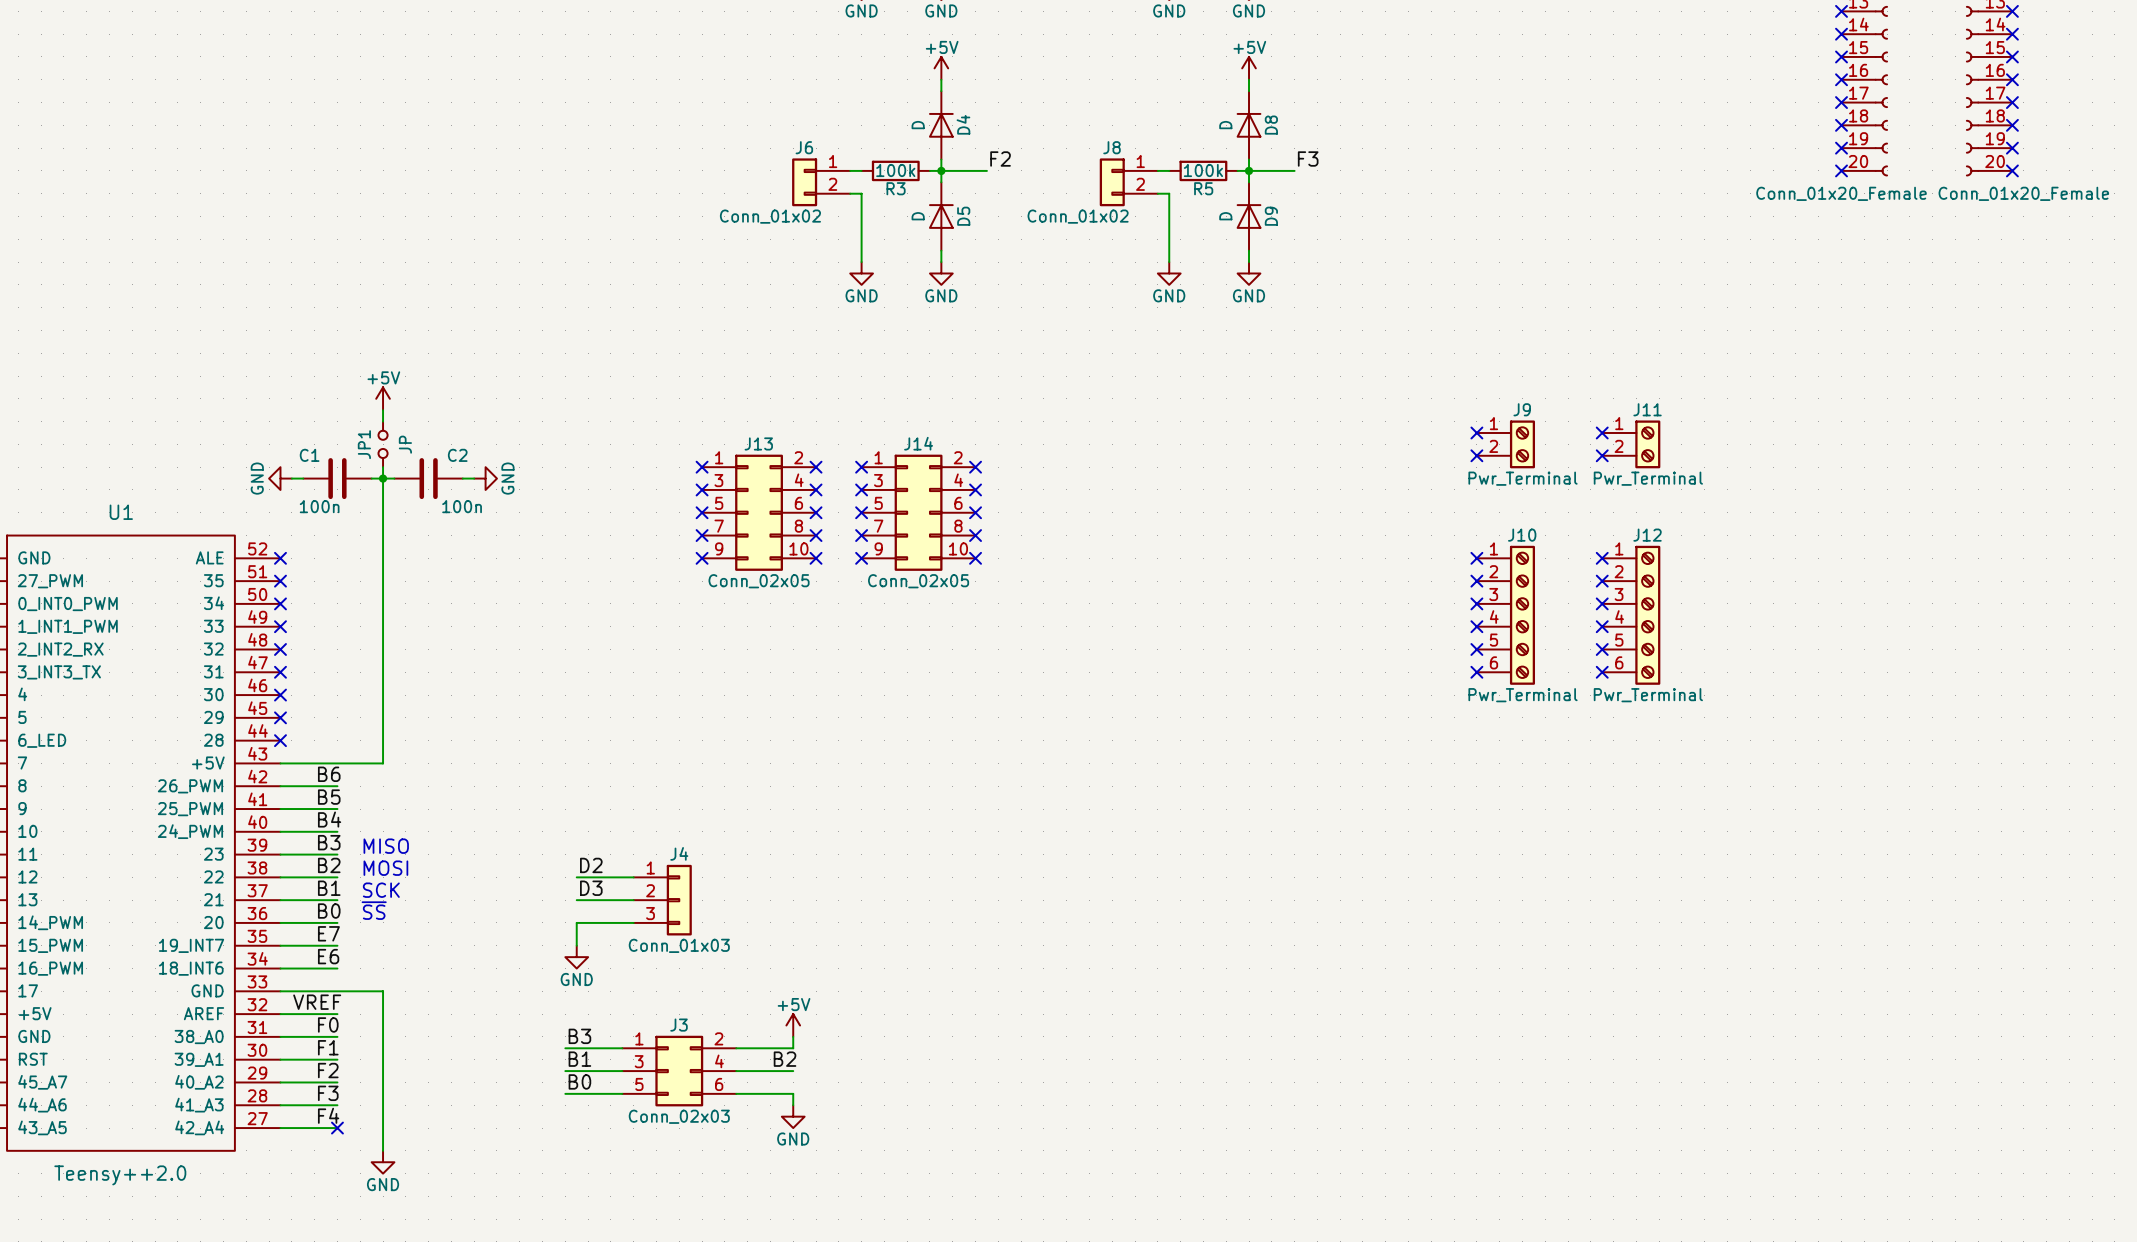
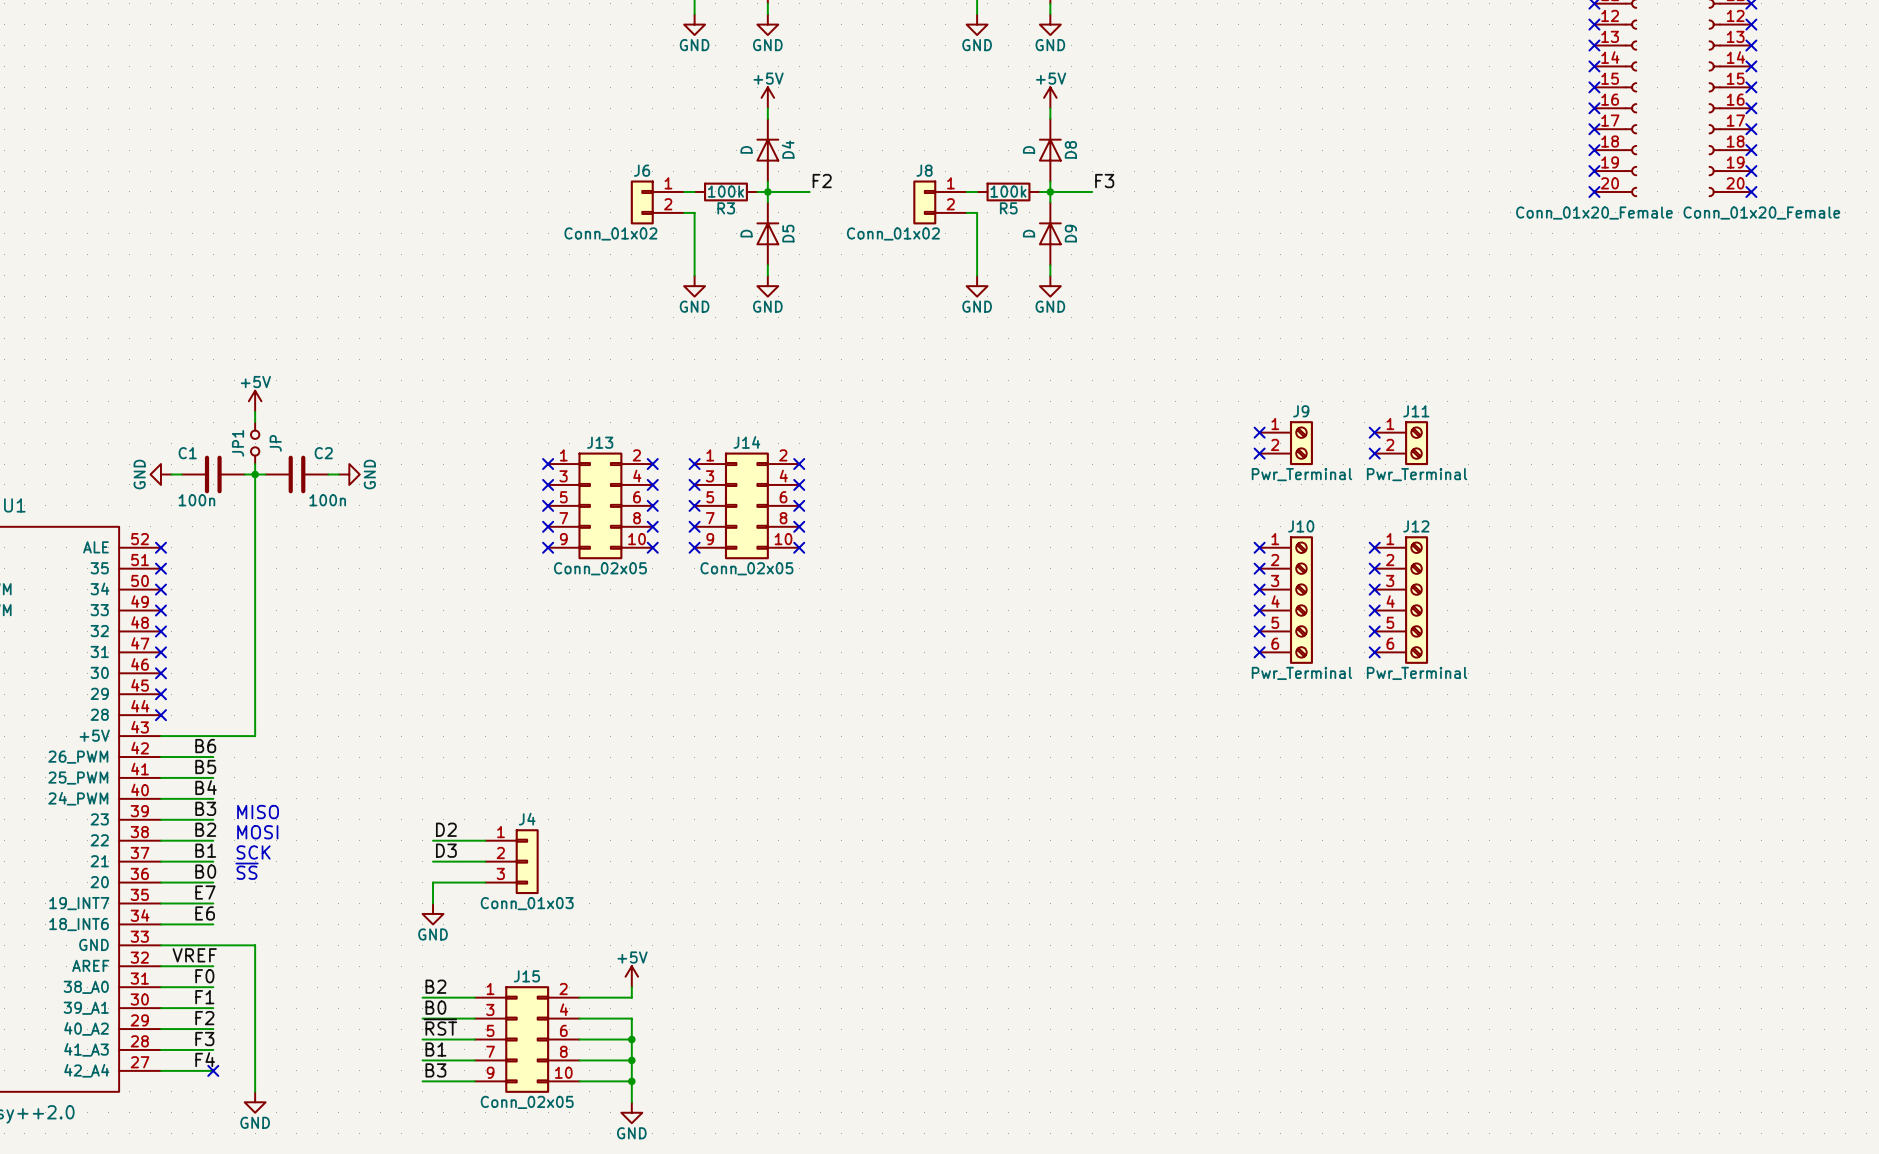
label: B3 (579, 1036) -> B2 (435, 986)
label: B1 (579, 1059) -> B0 (435, 1007)
label: B2 (785, 1059) -> none
J3: Conn_02x03 (679, 1071) -> none
wire: none -> (631, 1018) (631, 1039)
label: B0 (579, 1081) -> ~{RST} (440, 1027)
J15: none -> Conn_02x05 (527, 1039)
junction: none -> (631, 1039)
label: none -> B1 (435, 1049)
wire: none -> (631, 1049) (631, 1102)
wire: none -> (422, 1060) (474, 1060)
wire: none -> (579, 1060) (631, 1060)
power symbol position: GND (793, 1116) -> GND (631, 1112)
junction: none -> (631, 1060)
label: none -> B3 (435, 1070)
wire: none -> (422, 1081) (474, 1081)
wire: none -> (579, 1081) (631, 1081)
junction: none -> (631, 1081)

